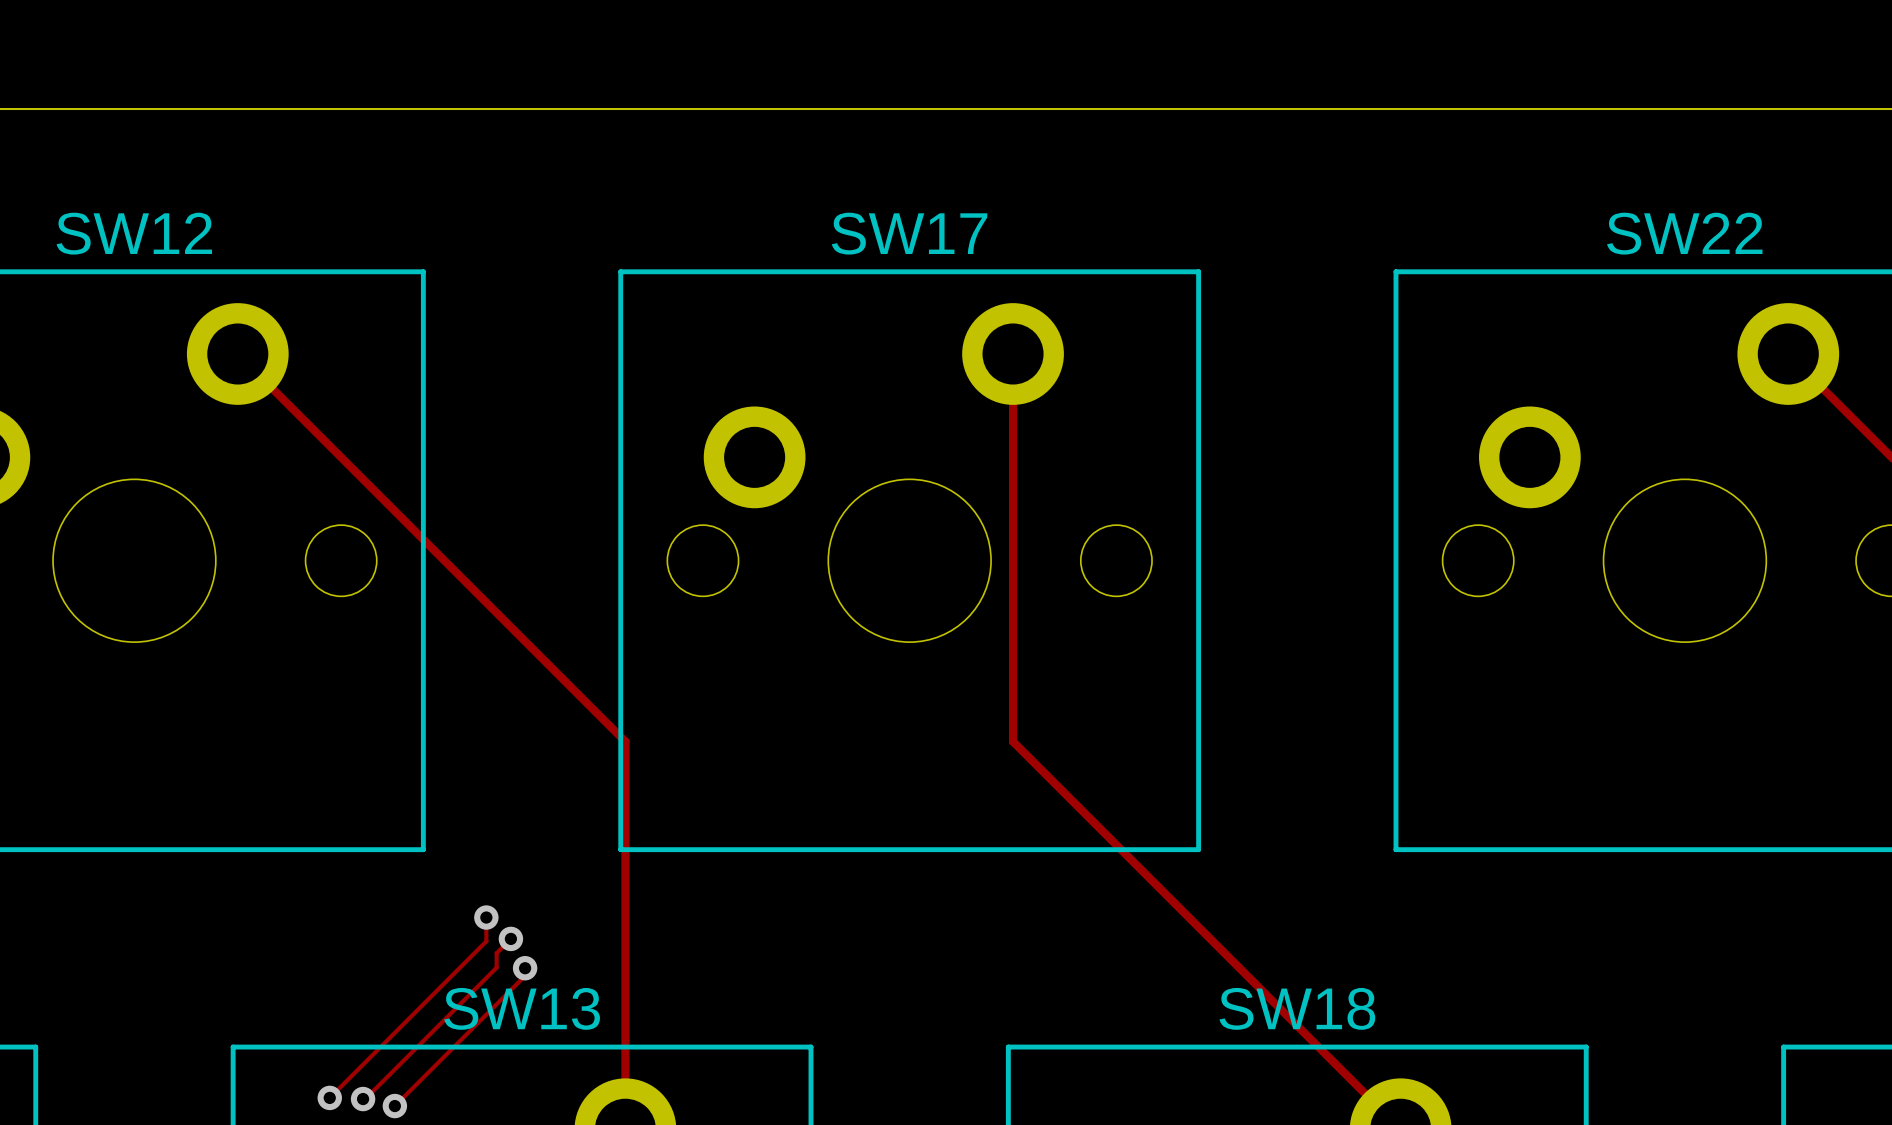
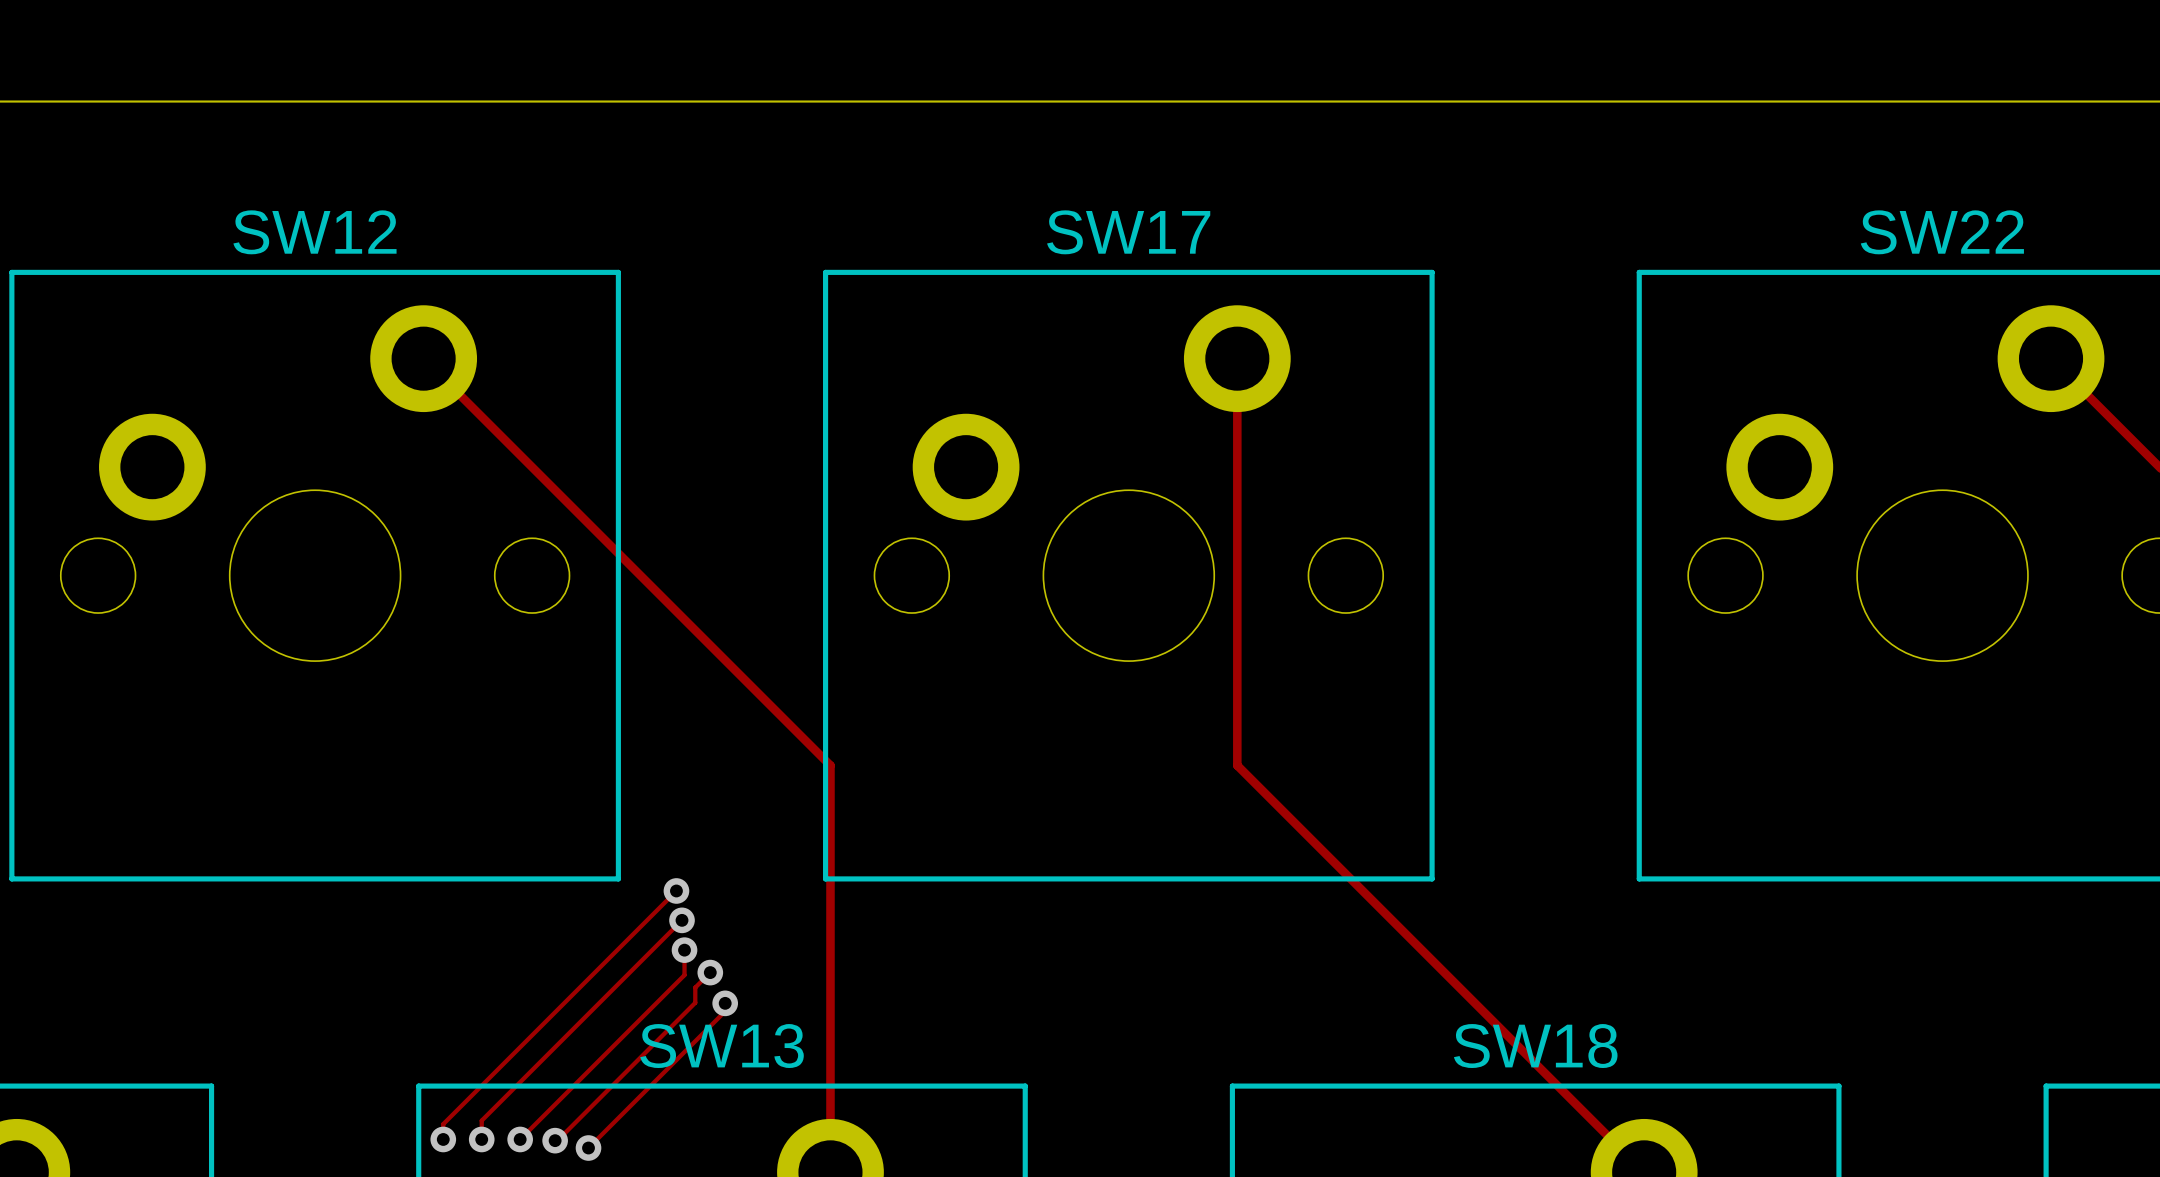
track: none -> (676, 890) (443, 1124) (443, 1139)
via: none -> (676, 890)
track: none -> (682, 920) (481, 1120) (481, 1139)
via: none -> (682, 920)
via: none -> (443, 1139)
via: none -> (481, 1139)

